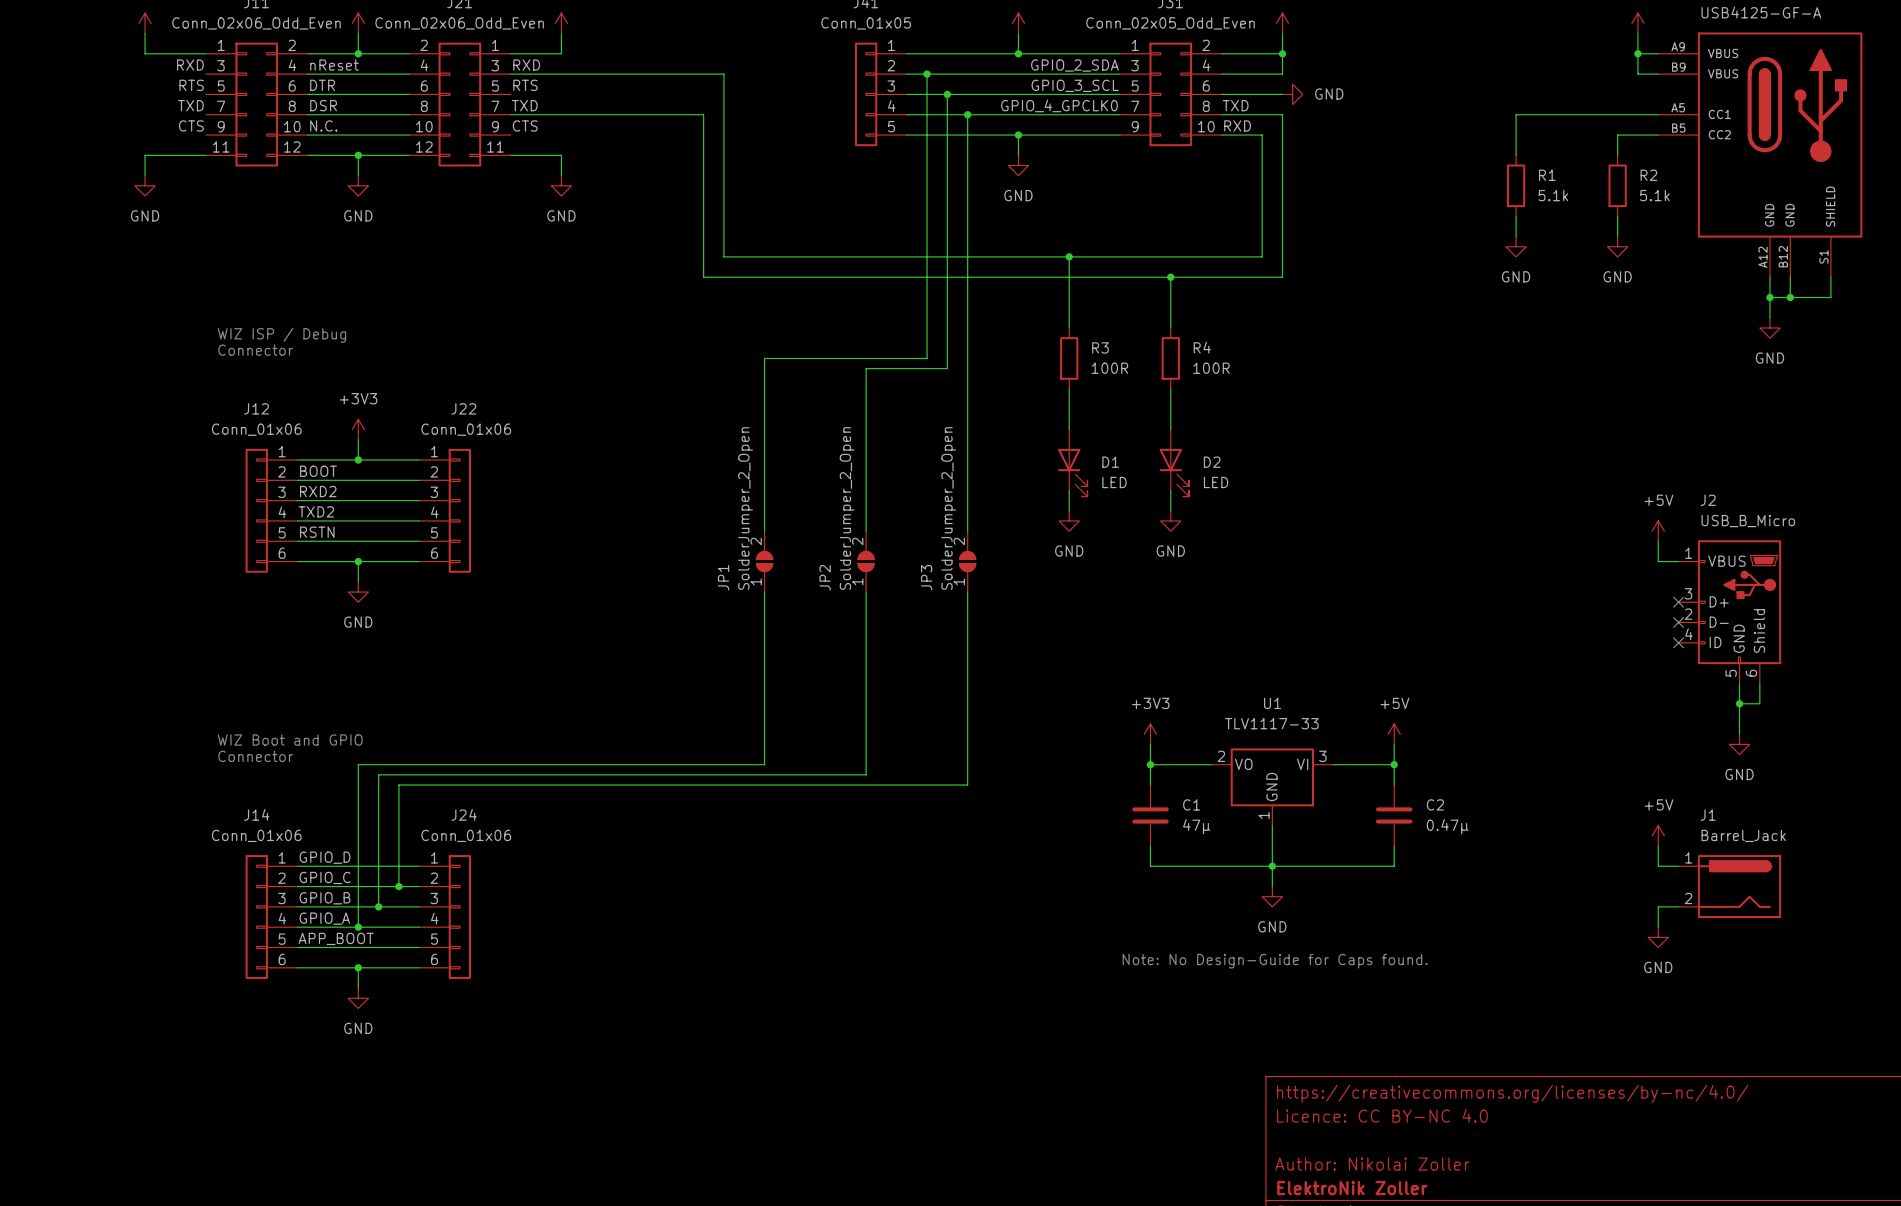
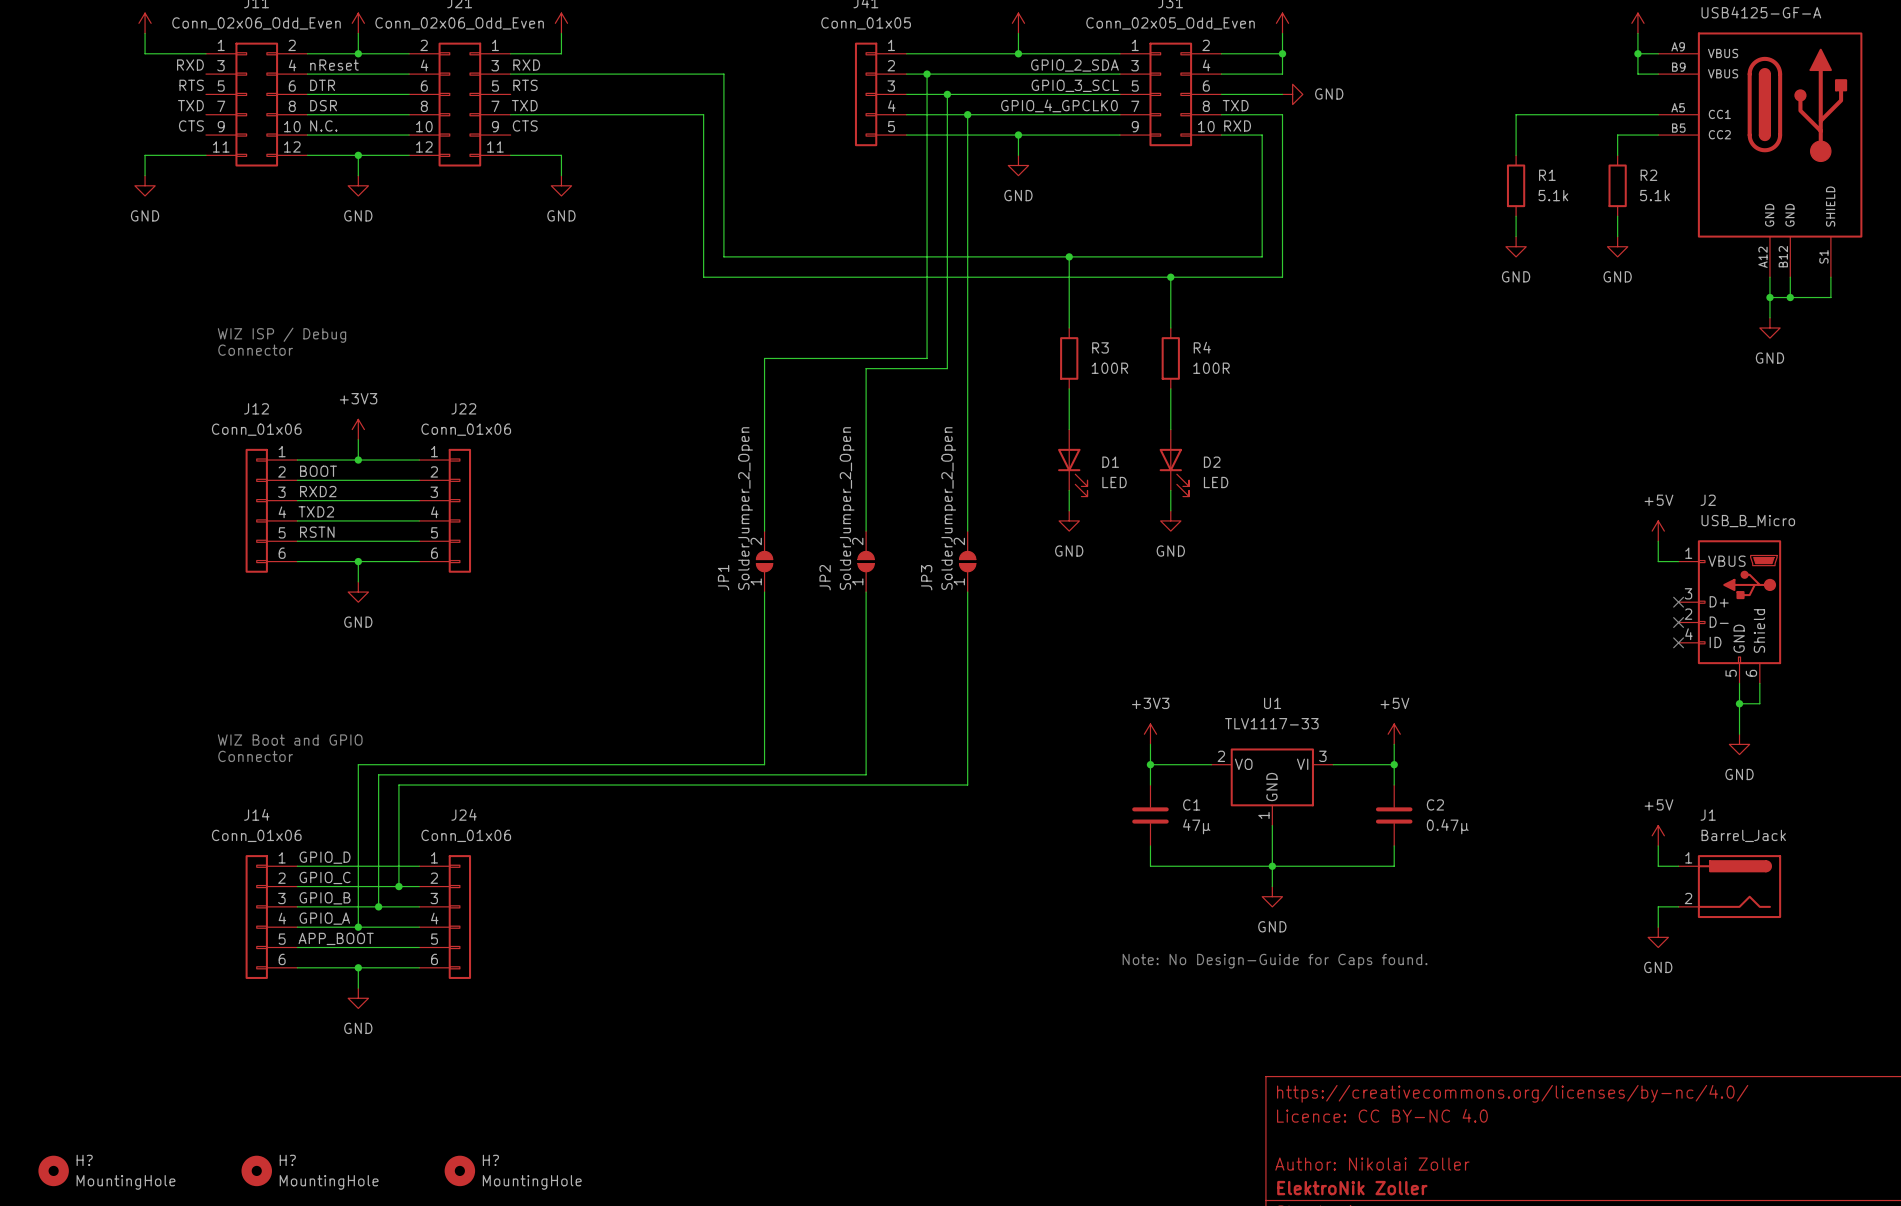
H?: none -> MountingHole (53, 1170)
H?: none -> MountingHole (256, 1170)
H?: none -> MountingHole (459, 1170)

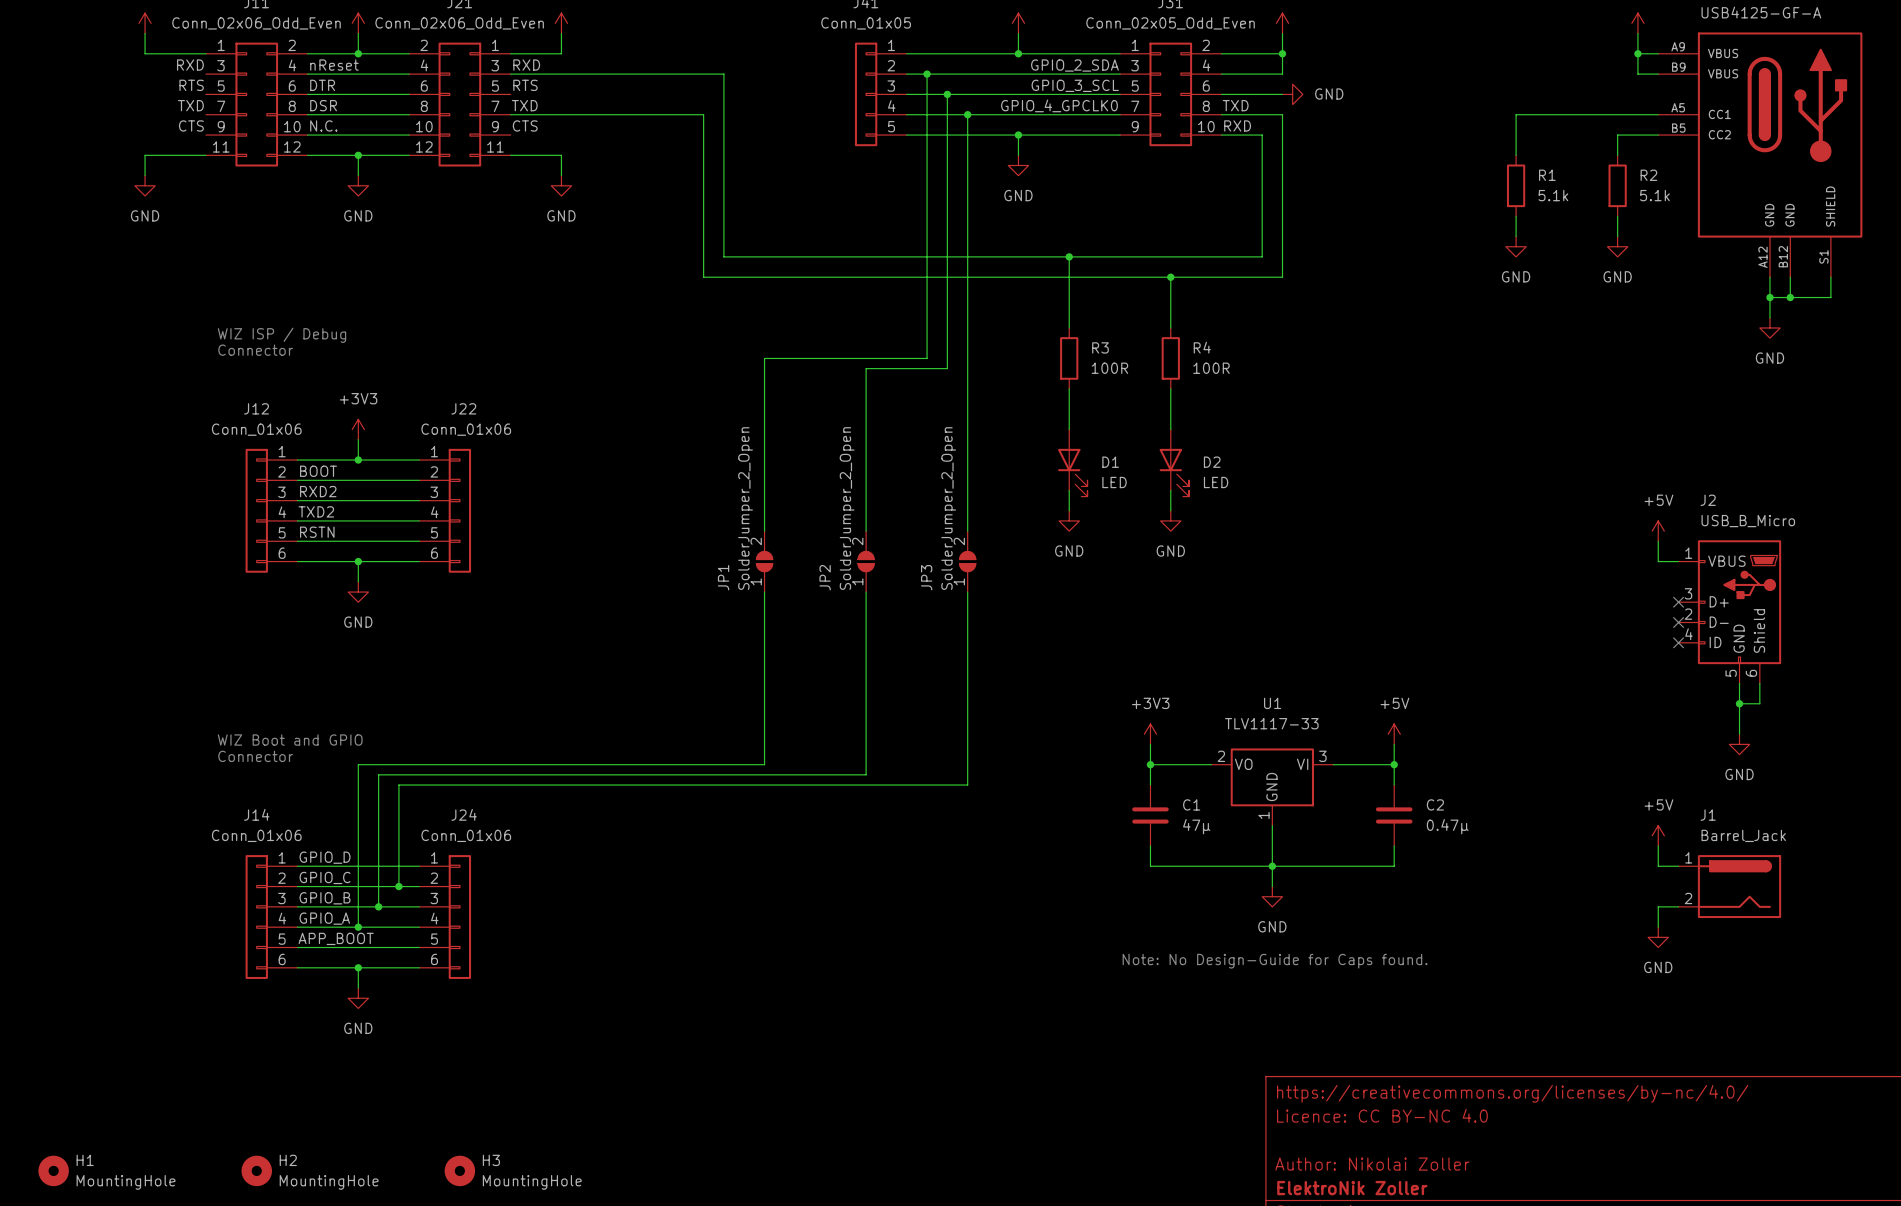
H? name: H? (84, 1160) -> H1 (85, 1160)
H? name: H? (287, 1160) -> H2 (288, 1160)
H? name: H? (490, 1160) -> H3 (491, 1160)

